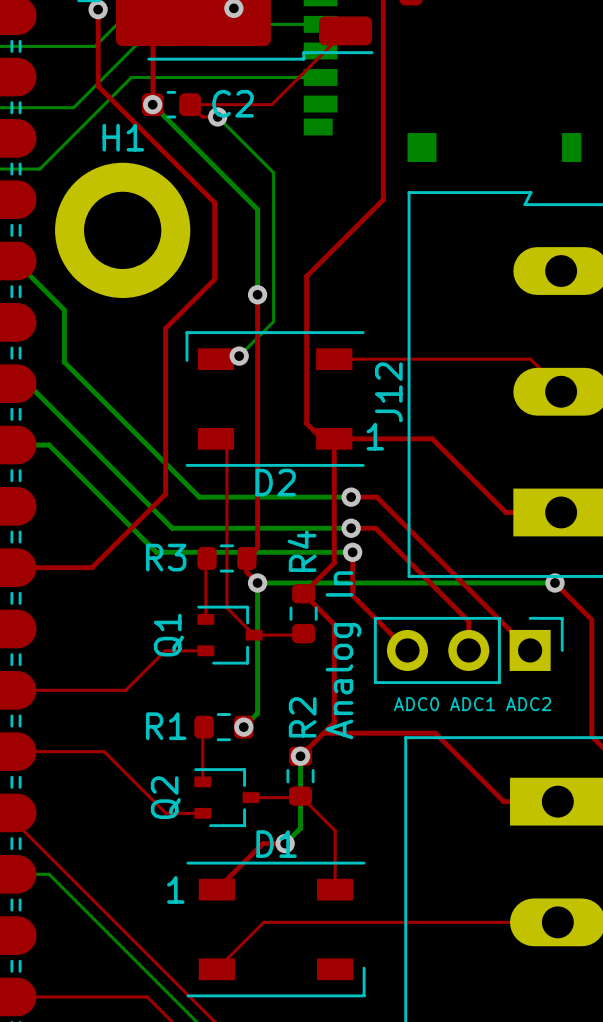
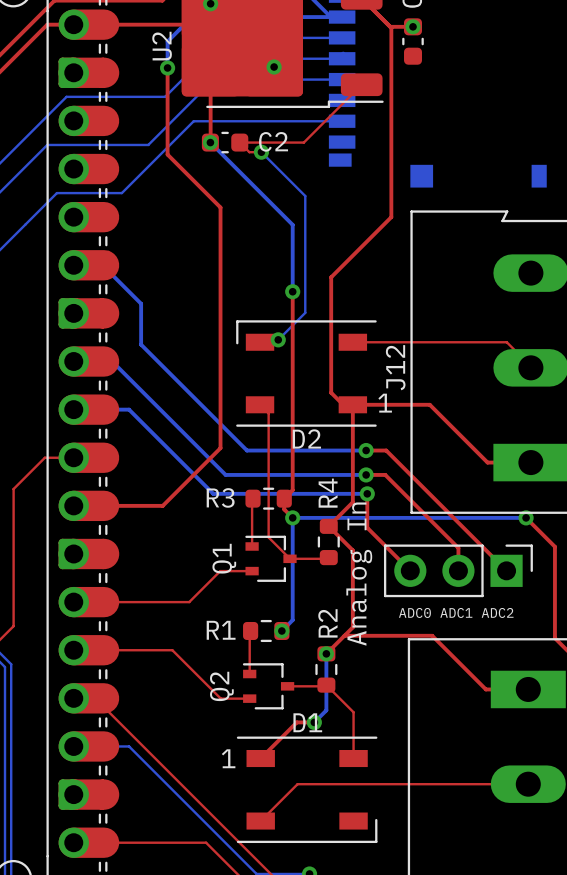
top track: (98, 86) (214, 202) (214, 279) (165, 328) -> (167, 128) (167, 154) (220, 207) (220, 318)
H1: (122, 230) -> none

